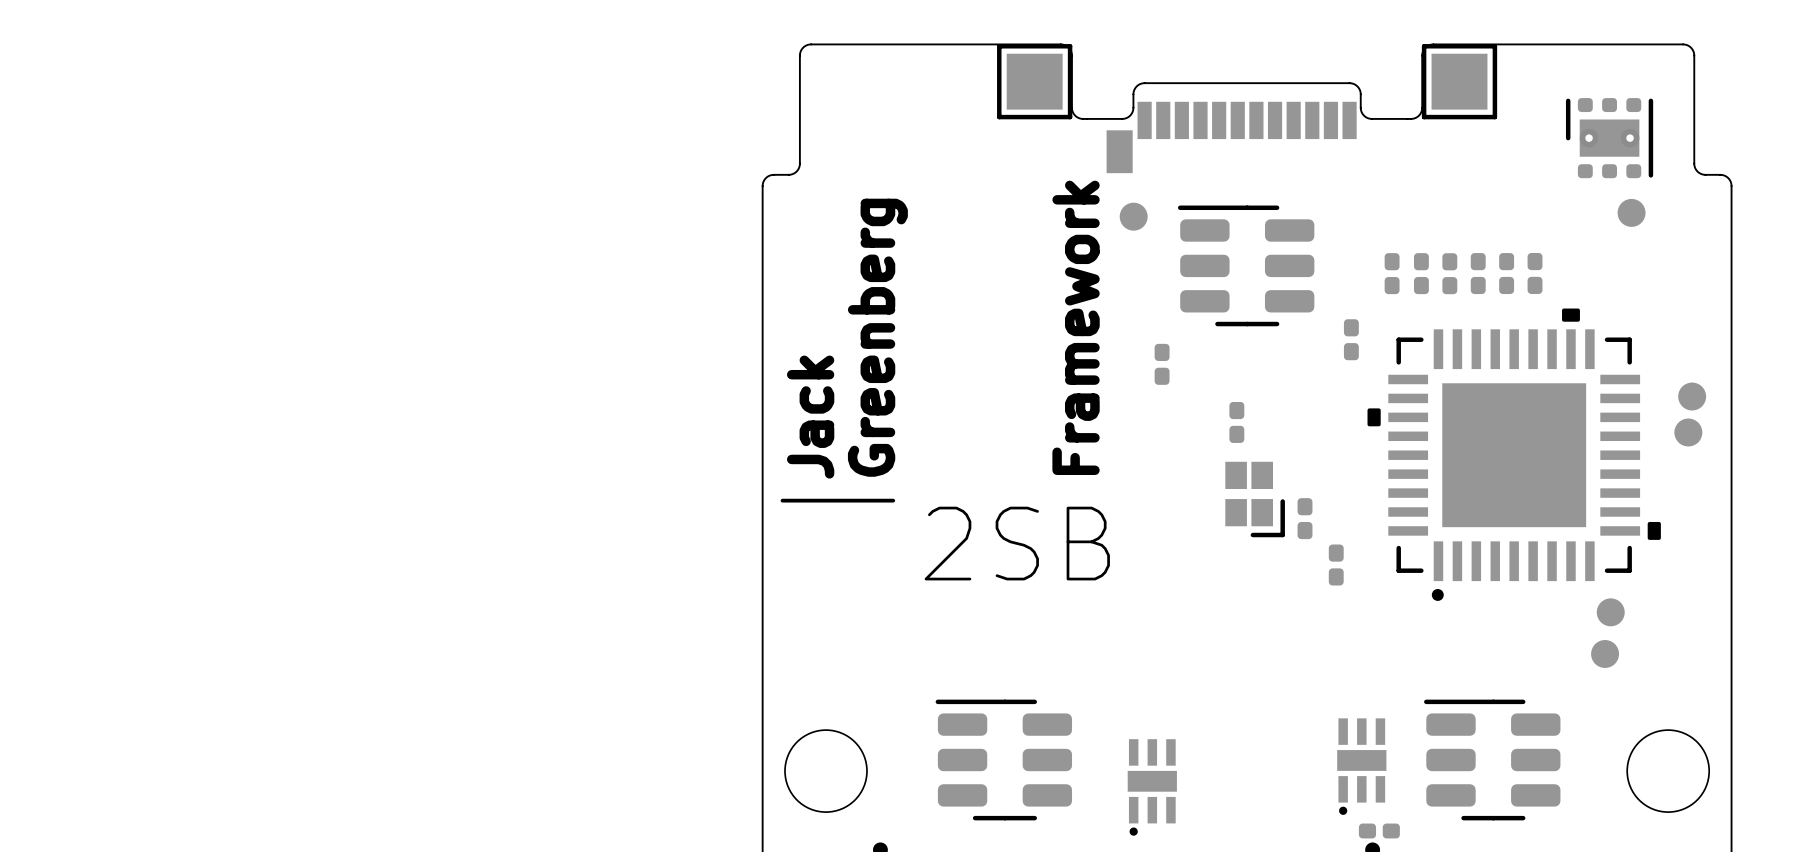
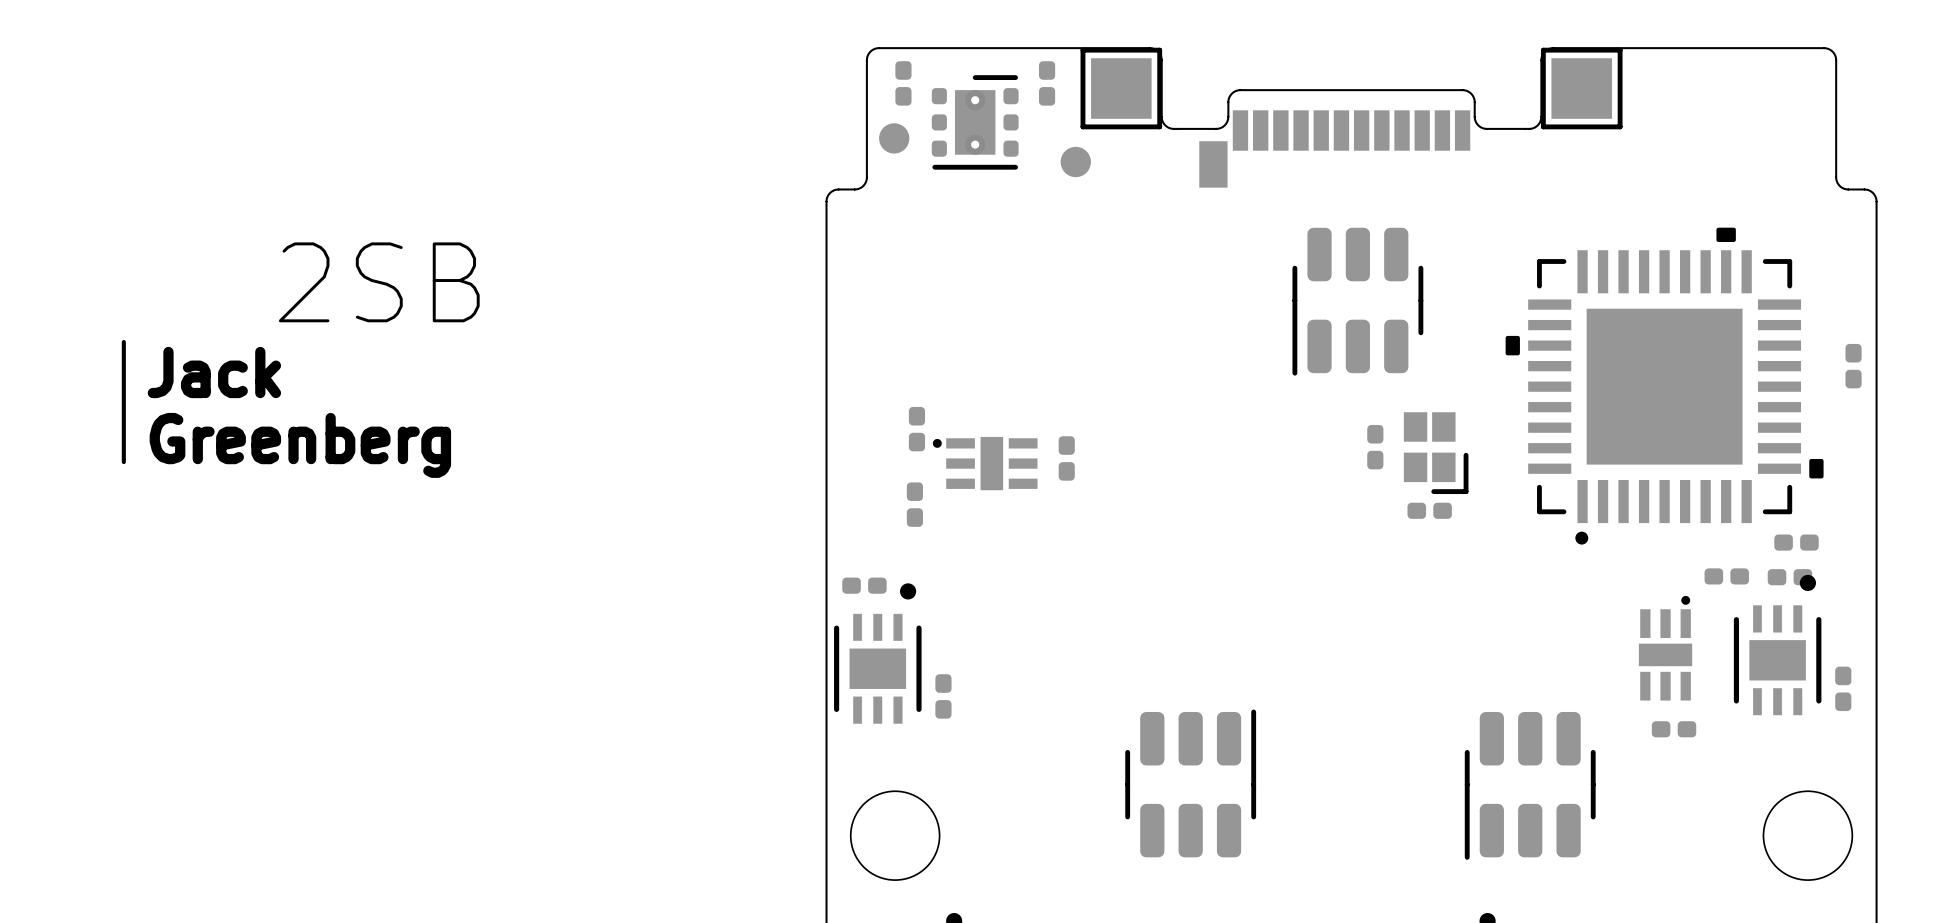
part: none -> (903, 83)
part: none -> (1047, 83)
part: none -> (894, 138)
part rotation: 0° (1609, 138) -> 90° clockwise (975, 122)
part position: (1609, 138) -> (975, 122)
part: (1631, 212) -> none
part position: (1133, 216) -> (1075, 162)
part rotation: 0° (1246, 265) -> 90° counterclockwise (1357, 301)
part: (1392, 273) -> none
part: (1421, 273) -> none
part: (1449, 273) -> none
part: (1478, 273) -> none
part: (1506, 273) -> none
part: (1535, 273) -> none
line: none -> (123, 342) (123, 462)
text: Framework (1076, 327) -> none
text rotation: 0° (877, 337) -> 90° clockwise (300, 445)
text position: Greenberg (877, 337) -> Greenberg (300, 445)
part: none -> (1853, 366)
part: (1351, 339) -> none
part: (1162, 364) -> none
part: none -> (916, 429)
part: (1692, 396) -> none
text rotation: 0° (810, 417) -> 90° clockwise (214, 372)
text position: Jack (810, 417) -> Jack (214, 372)
part position: (1236, 422) -> (1375, 447)
part: none -> (1066, 458)
part: none -> (985, 463)
part: (1688, 432) -> none
part position: (1514, 454) -> (1664, 386)
part: none -> (914, 504)
part: none -> (1429, 510)
part position: (1255, 499) -> (1436, 453)
line: (782, 500) (893, 500) -> none
part: none -> (1796, 542)
part: (1305, 518) -> none
part: none -> (1726, 576)
part: none -> (1789, 577)
part: none -> (864, 585)
text position: 2SB (1017, 543) -> 2SB (379, 282)
part: (1336, 565) -> none
part: none -> (1777, 645)
part: none -> (1665, 648)
part: none -> (877, 653)
part: (1610, 612) -> none
part: none -> (1843, 688)
part: none -> (943, 696)
part: (1605, 653) -> none
part: none -> (1674, 729)
part rotation: 0° (1003, 760) -> 90° clockwise (1190, 783)
part position: (1003, 760) -> (1190, 783)
part rotation: 0° (1492, 760) -> 90° counterclockwise (1530, 785)
part position: (1492, 760) -> (1530, 785)
part: (1361, 766) -> none
part: (1152, 787) -> none
part: (1379, 830) -> none

